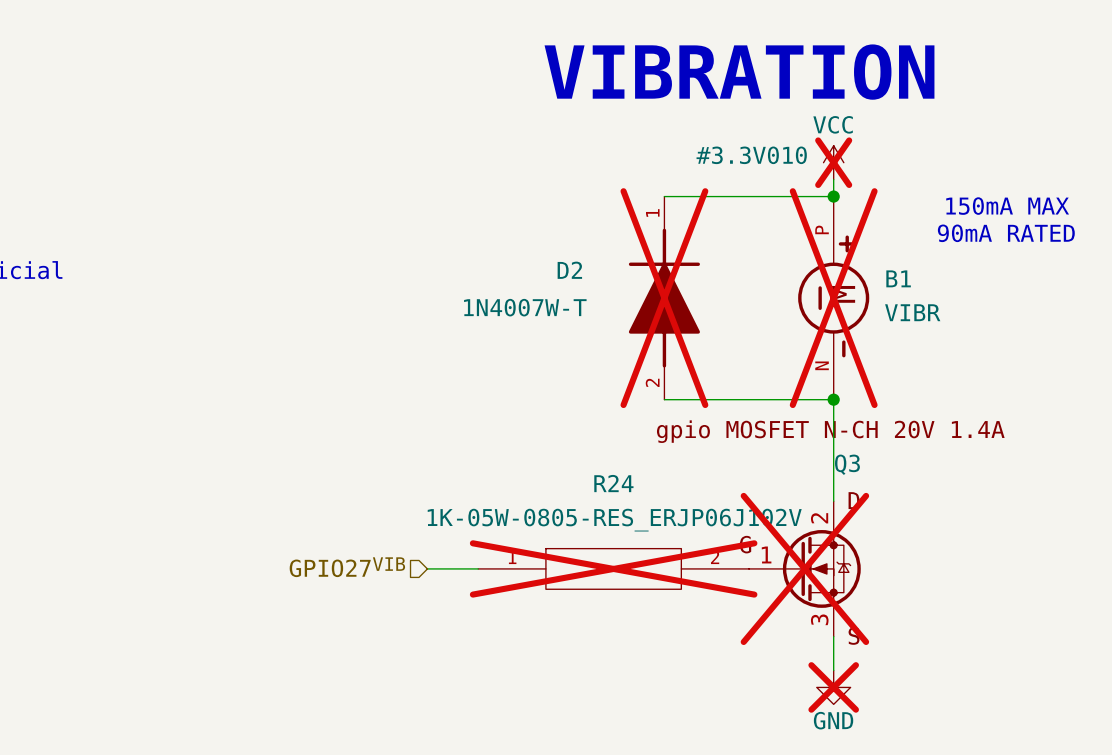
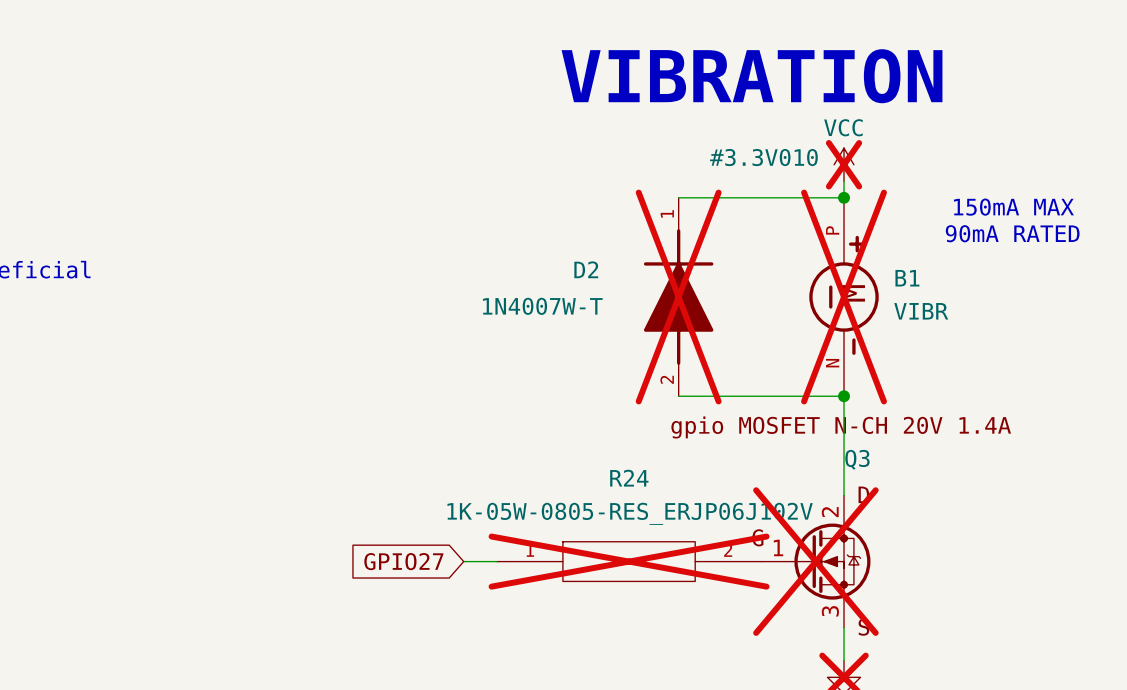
hierarchical label: GPIO27VIB (347, 567) -> none
global label: none -> GPIO27 (403, 561)
wire: (427, 568) (444, 568) -> none

